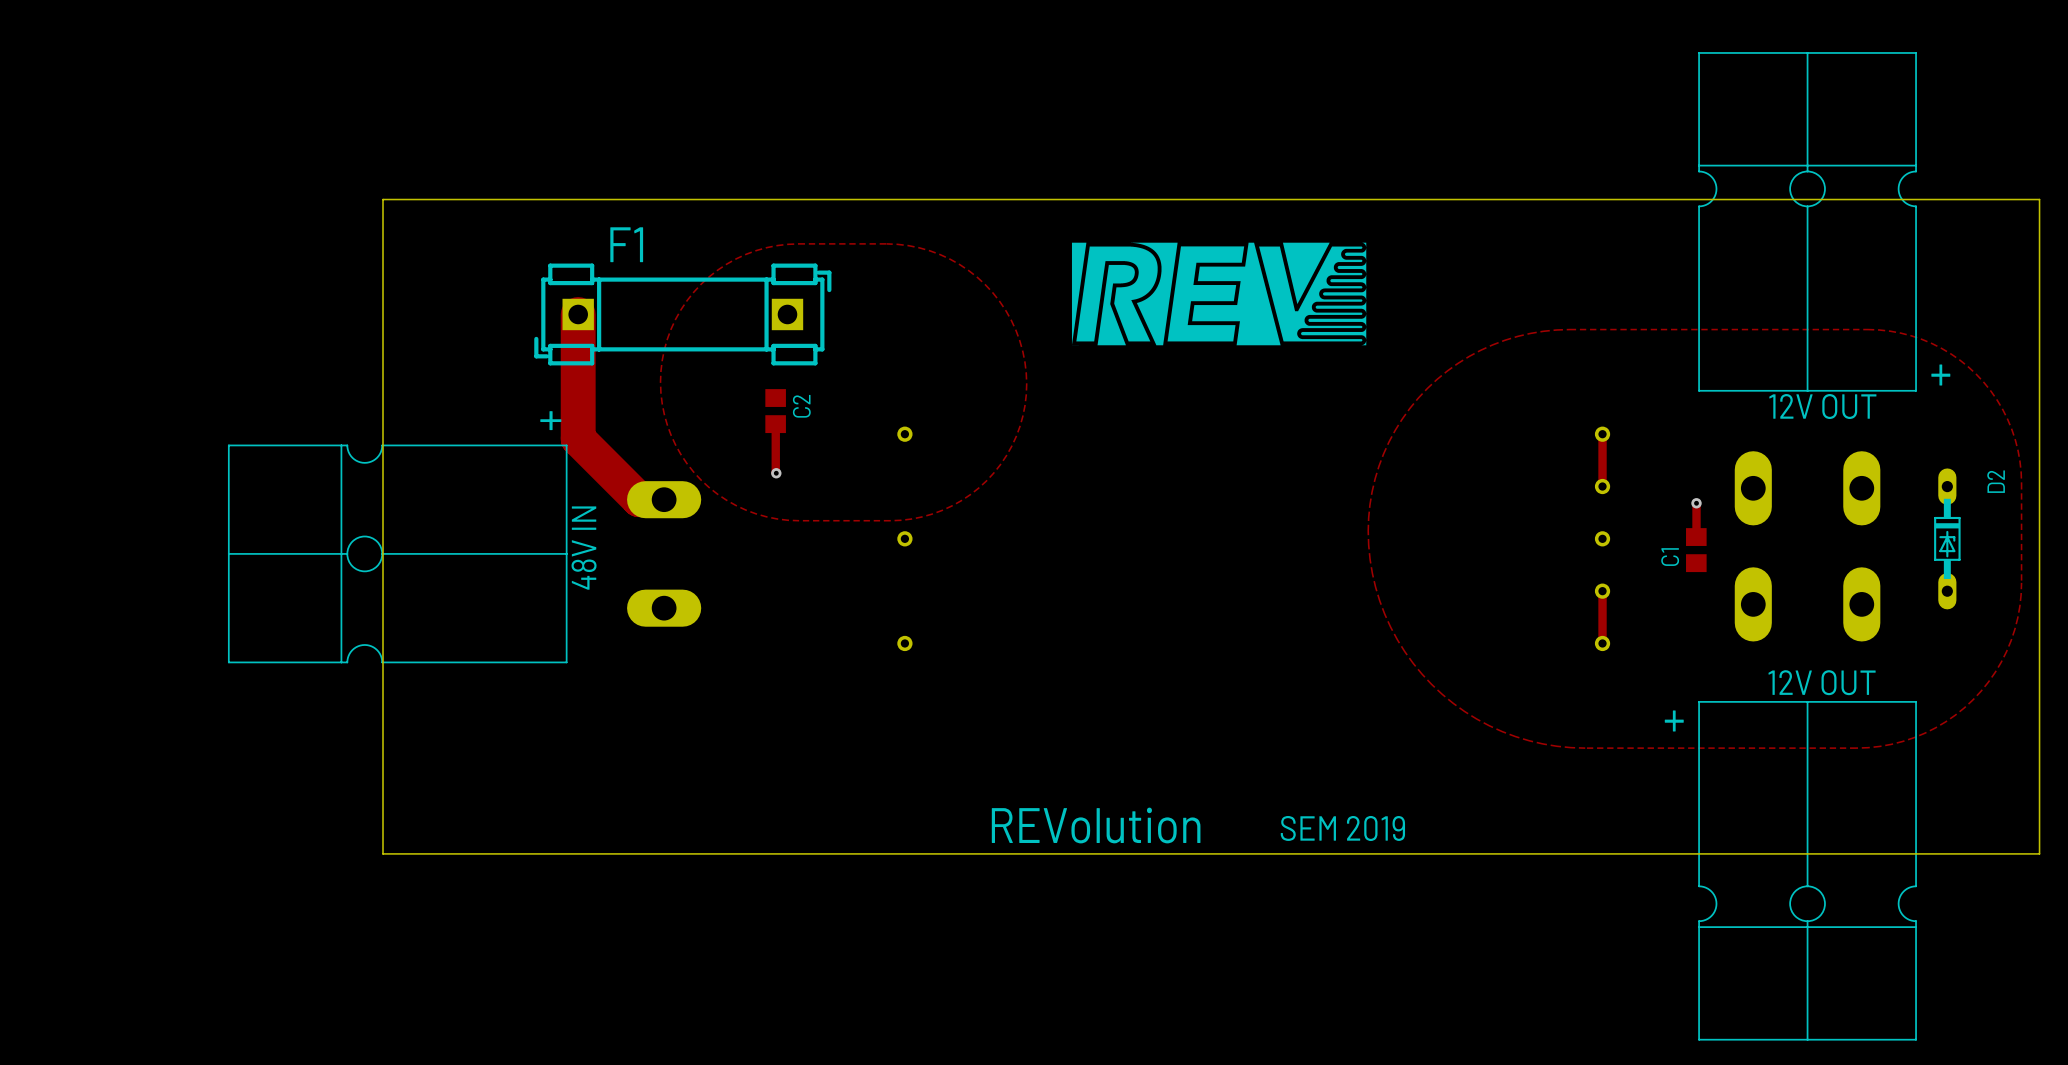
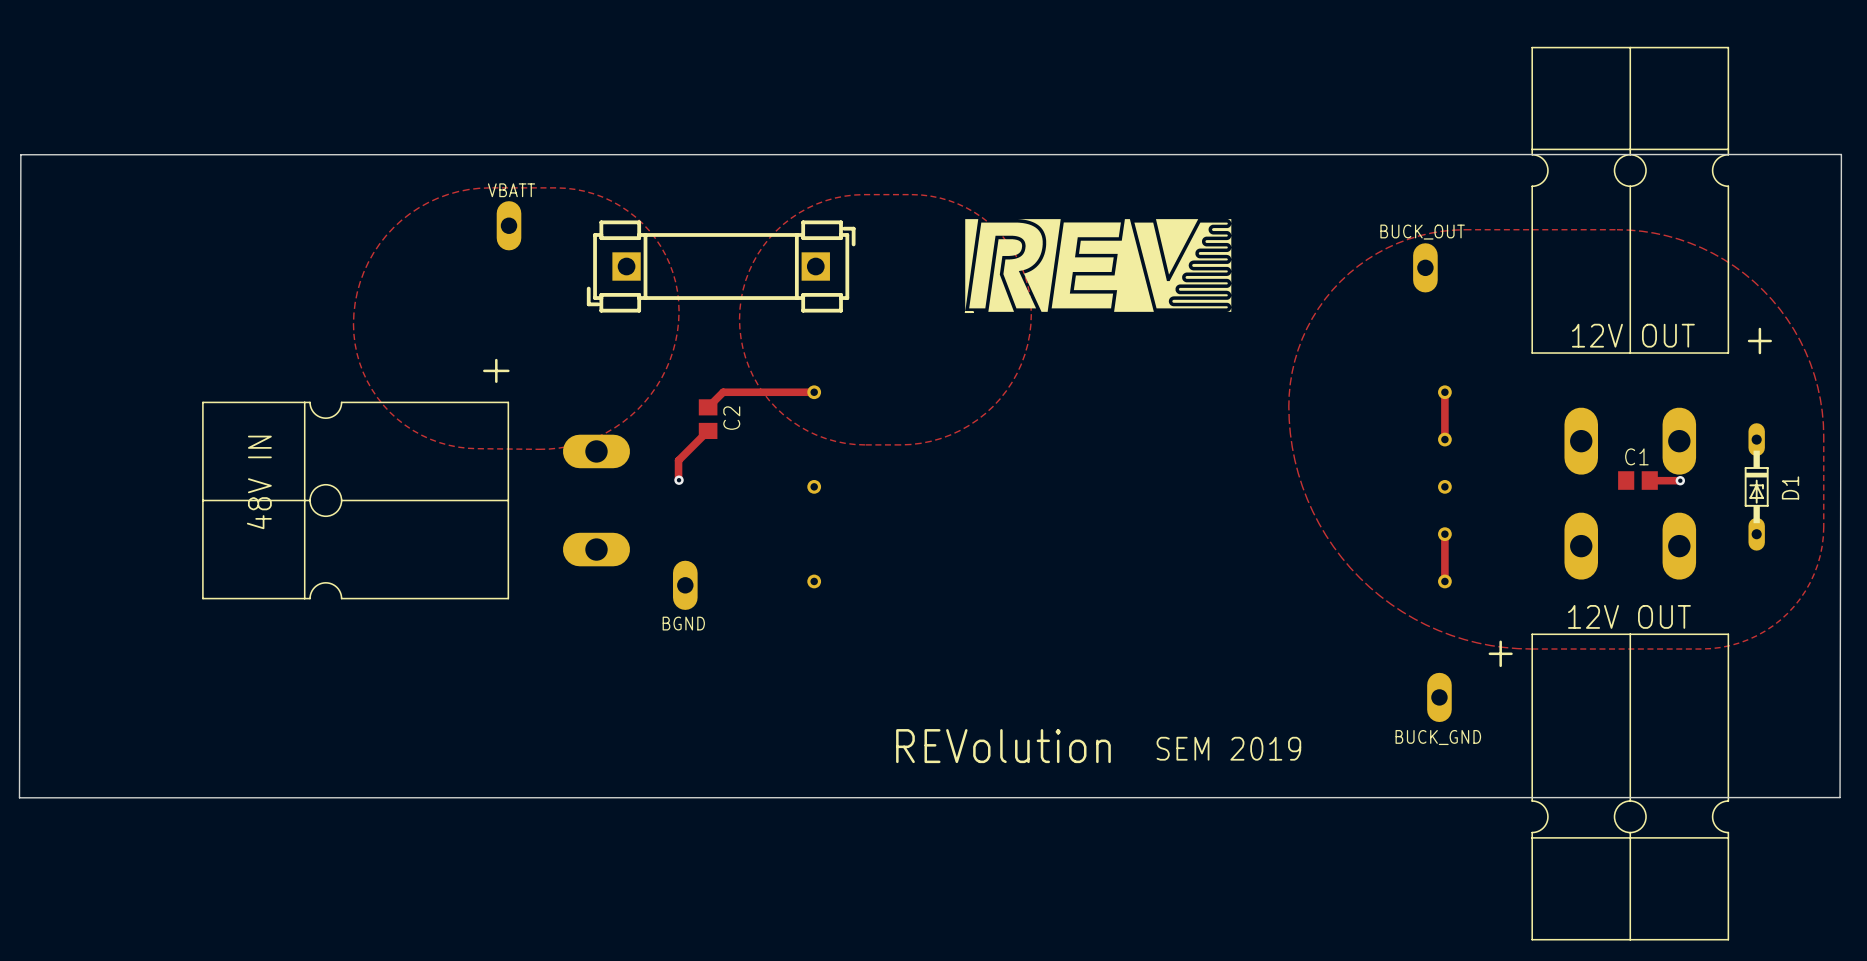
board edge: (383, 199) (2039, 199) (2039, 853) (383, 853) (383, 199) -> (1841, 154) (20, 154) (19, 797) (1840, 797) (1841, 154)
zone outline: none -> (489, 187) (565, 188) (584, 191) (603, 197) (628, 211) (643, 223) (660, 246) (669, 263) (675, 282) (679, 310) (675, 340) (666, 368) (651, 394) (638, 409) (622, 422) (597, 437) (578, 444) (549, 449) (477, 448) (448, 445) (421, 435) (397, 418) (377, 397) (362, 371) (356, 353) (353, 334) (355, 302) (363, 272) (379, 244) (401, 220) (427, 202) (458, 191) (489, 187)
zone outline: none -> (864, 194) (835, 198) (807, 208) (783, 224) (763, 246) (749, 271) (741, 299) (739, 329) (745, 358) (758, 384) (776, 408) (791, 420) (817, 435) (845, 443) (865, 444) (910, 444) (940, 438) (968, 425) (985, 413) (1006, 391) (1017, 373) (1027, 344) (1030, 324) (1030, 304) (1025, 277) (1013, 251) (1002, 236) (982, 217) (966, 207) (930, 196) (864, 194)
zone outline: (798, 243) (777, 245) (756, 250) (726, 264) (700, 284) (686, 300) (675, 319) (667, 339) (662, 360) (660, 392) (667, 424) (680, 454) (693, 472) (717, 494) (746, 510) (777, 519) (900, 520) (932, 514) (961, 500) (978, 488) (1000, 464) (1011, 446) (1022, 416) (1026, 384) (1024, 362) (1016, 330) (1006, 310) (985, 284) (968, 270) (950, 259) (929, 250) (897, 244) (798, 243) -> none
VBATT: none -> (509, 225)
part: none -> (721, 266)
BUCK_OUT: none -> (1425, 267)
track: (578, 314) (578, 438) (639, 499) (664, 499) -> none
F1: (682, 314) -> none
text position: 12V OUT (1822, 406) -> 12V OUT (1633, 335)
C2 position: (775, 411) -> (708, 419)
track: (775, 424) (776, 473) -> none
track: none -> (814, 392) (723, 392) (708, 407)
via position: (776, 473) -> (679, 480)
track: none -> (708, 430) (678, 460) (679, 480)
D2 name: D2 (1996, 481) -> D1 (1790, 487)
zone outline: (2021, 483) (2019, 461) (2015, 439) (2002, 409) (1990, 391) (1976, 374) (1959, 360) (1941, 348) (1911, 335) (1889, 331) (1867, 329) (1556, 329) (1517, 336) (1480, 350) (1457, 363) (1427, 388) (1402, 419) (1383, 453) (1372, 491) (1368, 531) (1372, 573) (1384, 614) (1404, 651) (1431, 684) (1464, 711) (1502, 731) (1529, 740) (1571, 747) (1856, 748) (1891, 744) (1914, 737) (1935, 727) (1955, 715) (1973, 699) (1988, 681) (2001, 662) (2011, 640) (2019, 606) (2021, 582) -> (1823, 436) (1820, 399) (1810, 363) (1793, 329) (1771, 299) (1744, 273) (1713, 253) (1690, 243) (1666, 235) (1629, 230) (1453, 230) (1419, 235) (1387, 247) (1367, 259) (1349, 273) (1332, 289) (1318, 308) (1307, 328) (1298, 349) (1292, 371) (1289, 394) (1292, 447) (1302, 486) (1319, 523) (1341, 557) (1369, 587) (1402, 611) (1438, 630) (1477, 642) (1504, 647) (1531, 649) (1701, 649) (1720, 647) (1739, 643) (1756, 635) (1773, 625) (1787, 613) (1800, 598) (1810, 582) (1817, 564) (1822, 545) (1823, 526)
track: (1696, 503) (1696, 536) -> none
via: (1696, 503) -> none
track: none -> (1649, 480) (1680, 480)
via: none -> (1680, 480)
text position: 48V IN (584, 548) -> 48V IN (259, 482)
C1 rotation: 0° (1696, 550) -> 90° clockwise (1637, 480)
C1 position: (1696, 550) -> (1637, 480)
BGND: none -> (685, 585)
BUCK_GND: none -> (1439, 697)

